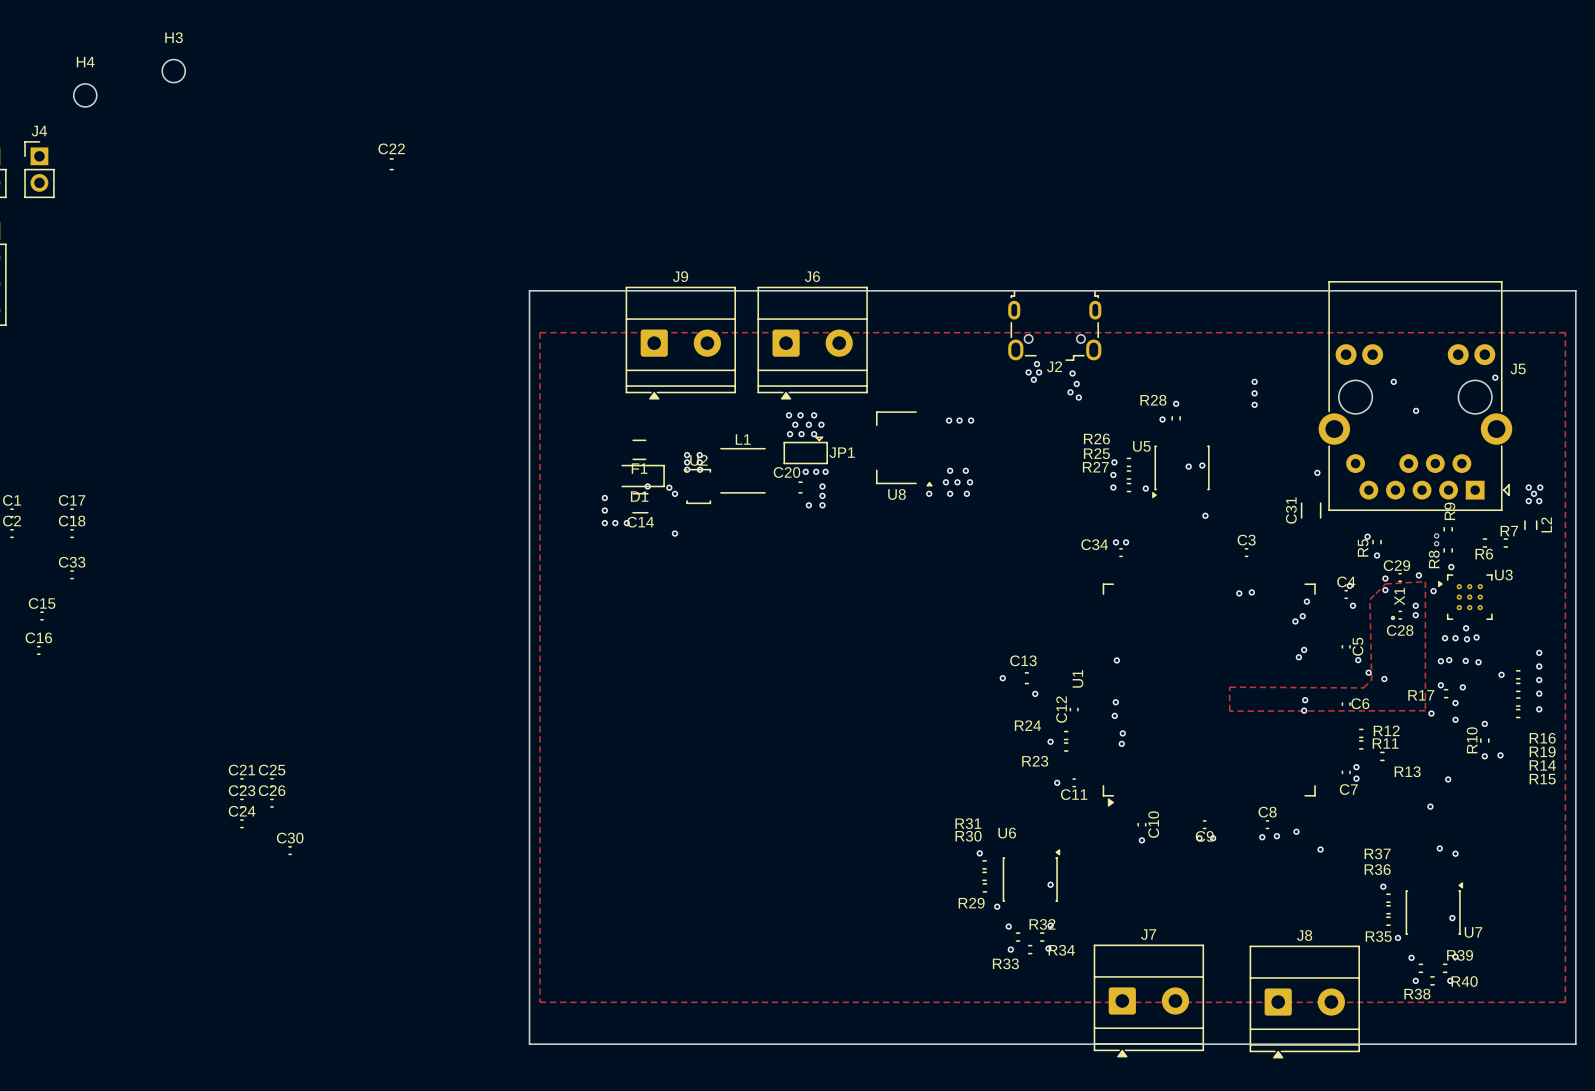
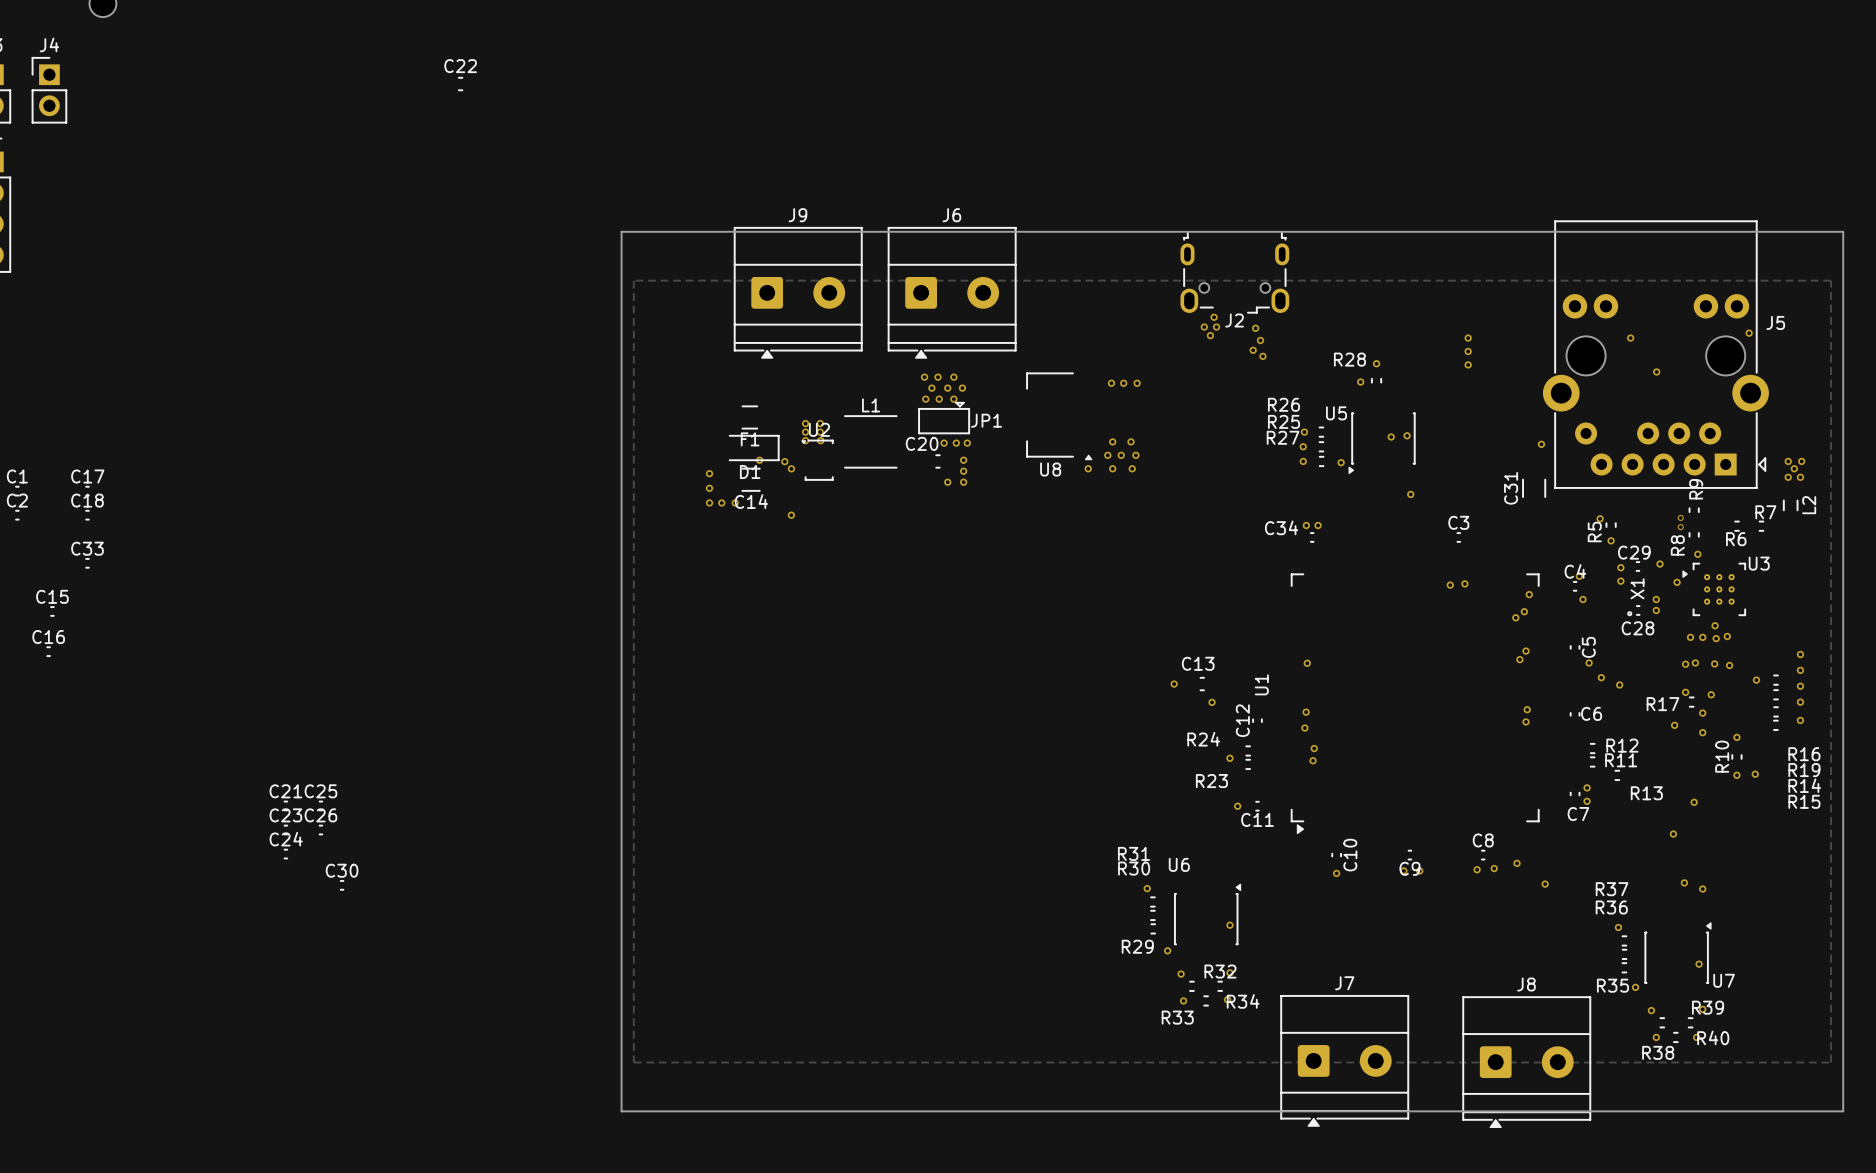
zone outline: (1425, 581) (1385, 583) (1369, 599) (1371, 680) (1363, 687) (1229, 687) (1229, 711) (1425, 710) (1425, 581) -> none

